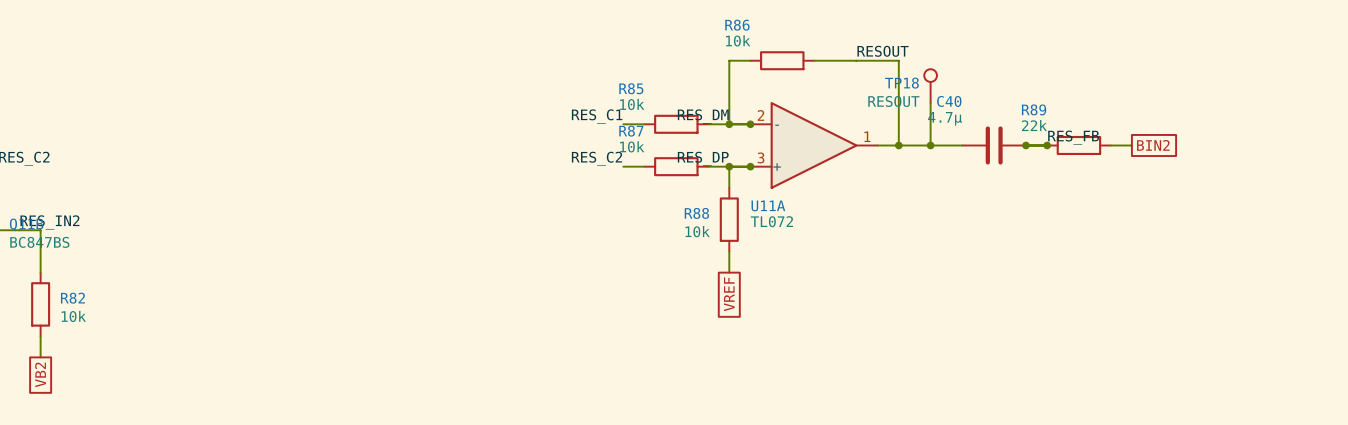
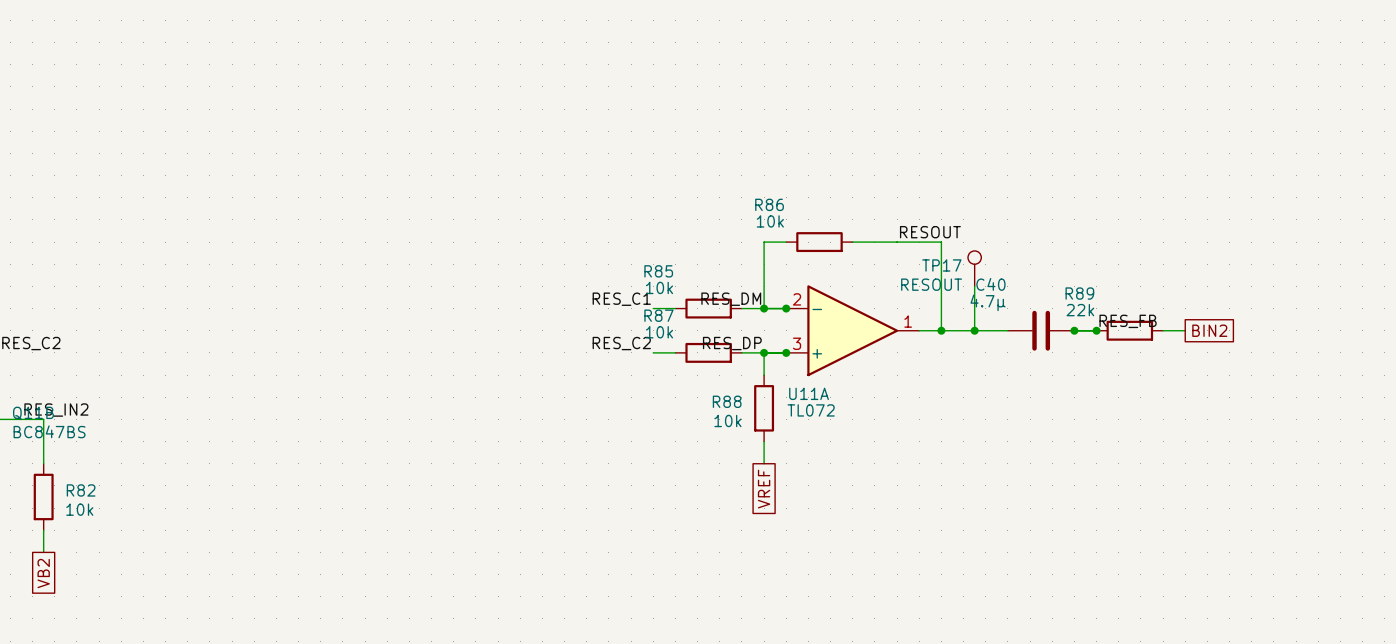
TP18 name: TP18 (901, 83) -> TP17 (941, 265)

